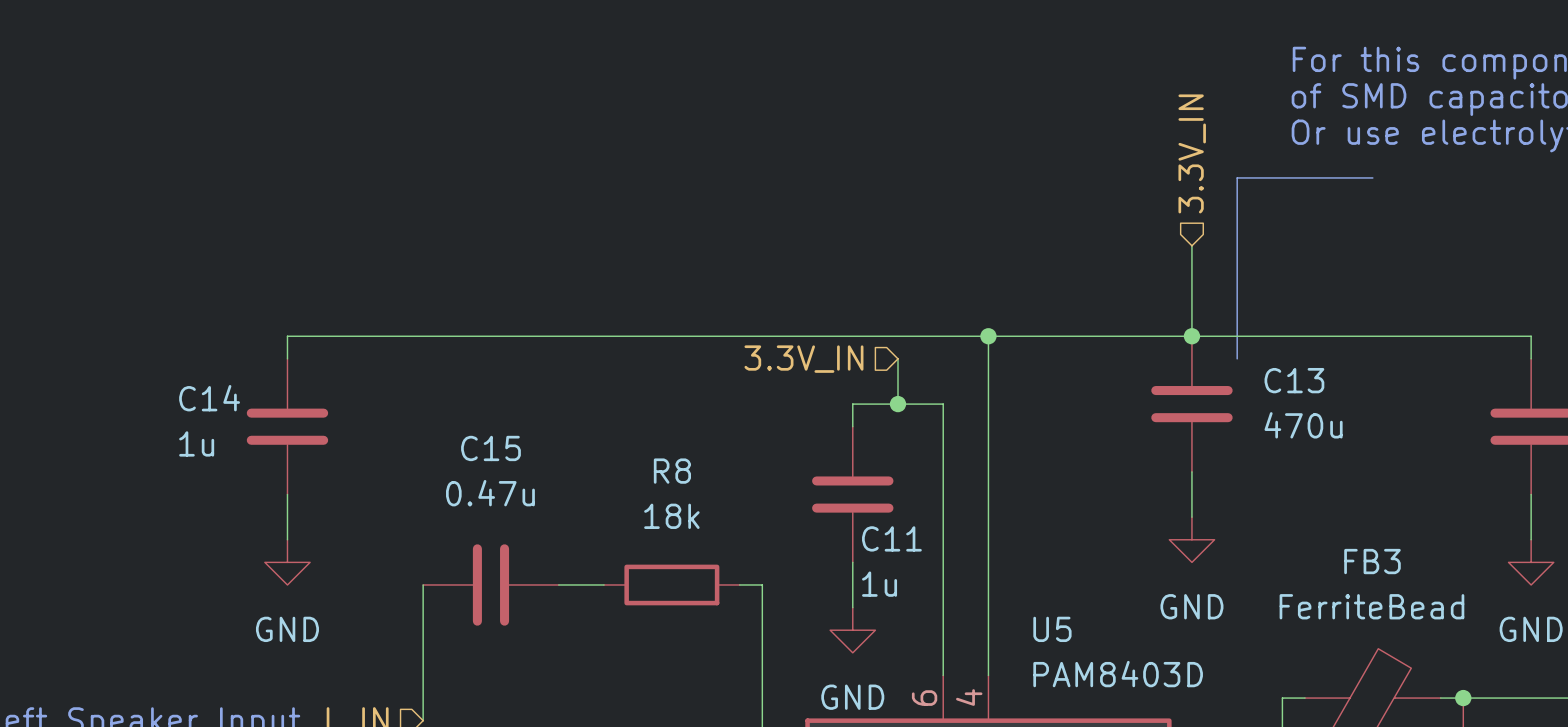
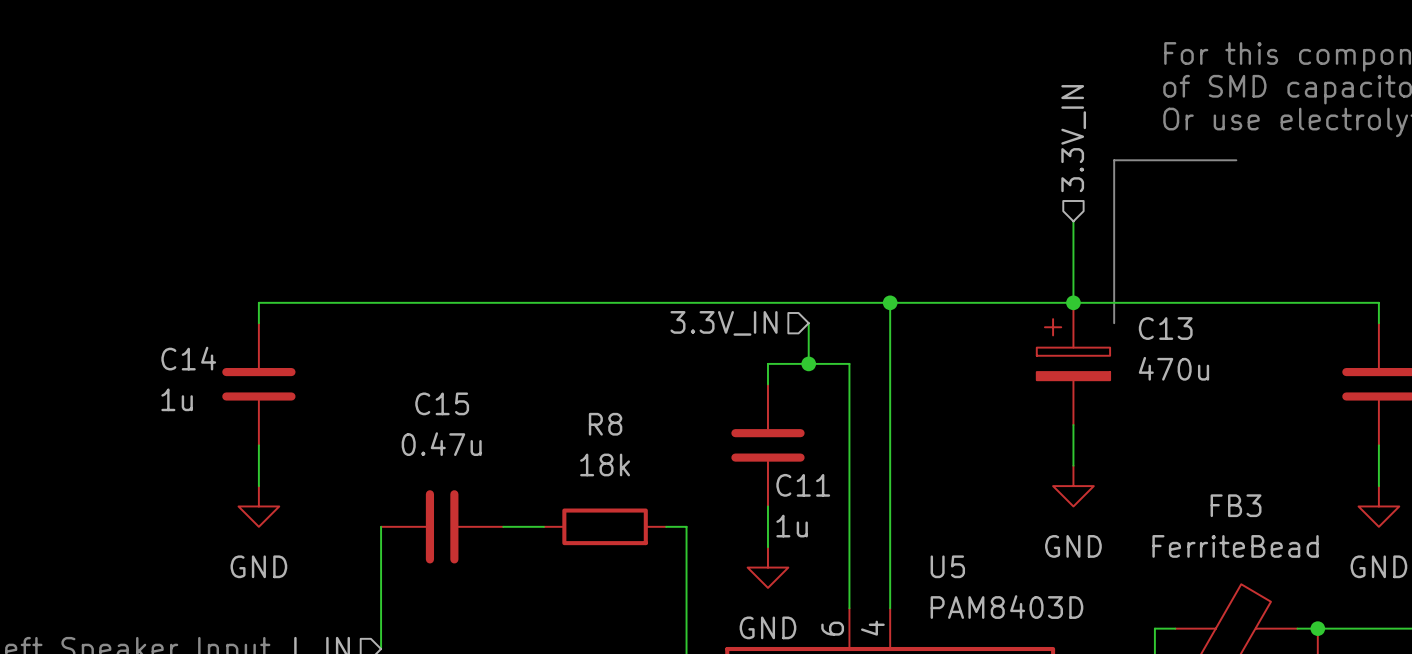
C13 symbol: [1151, 336, 1233, 472] -> [1036, 302, 1111, 426]

